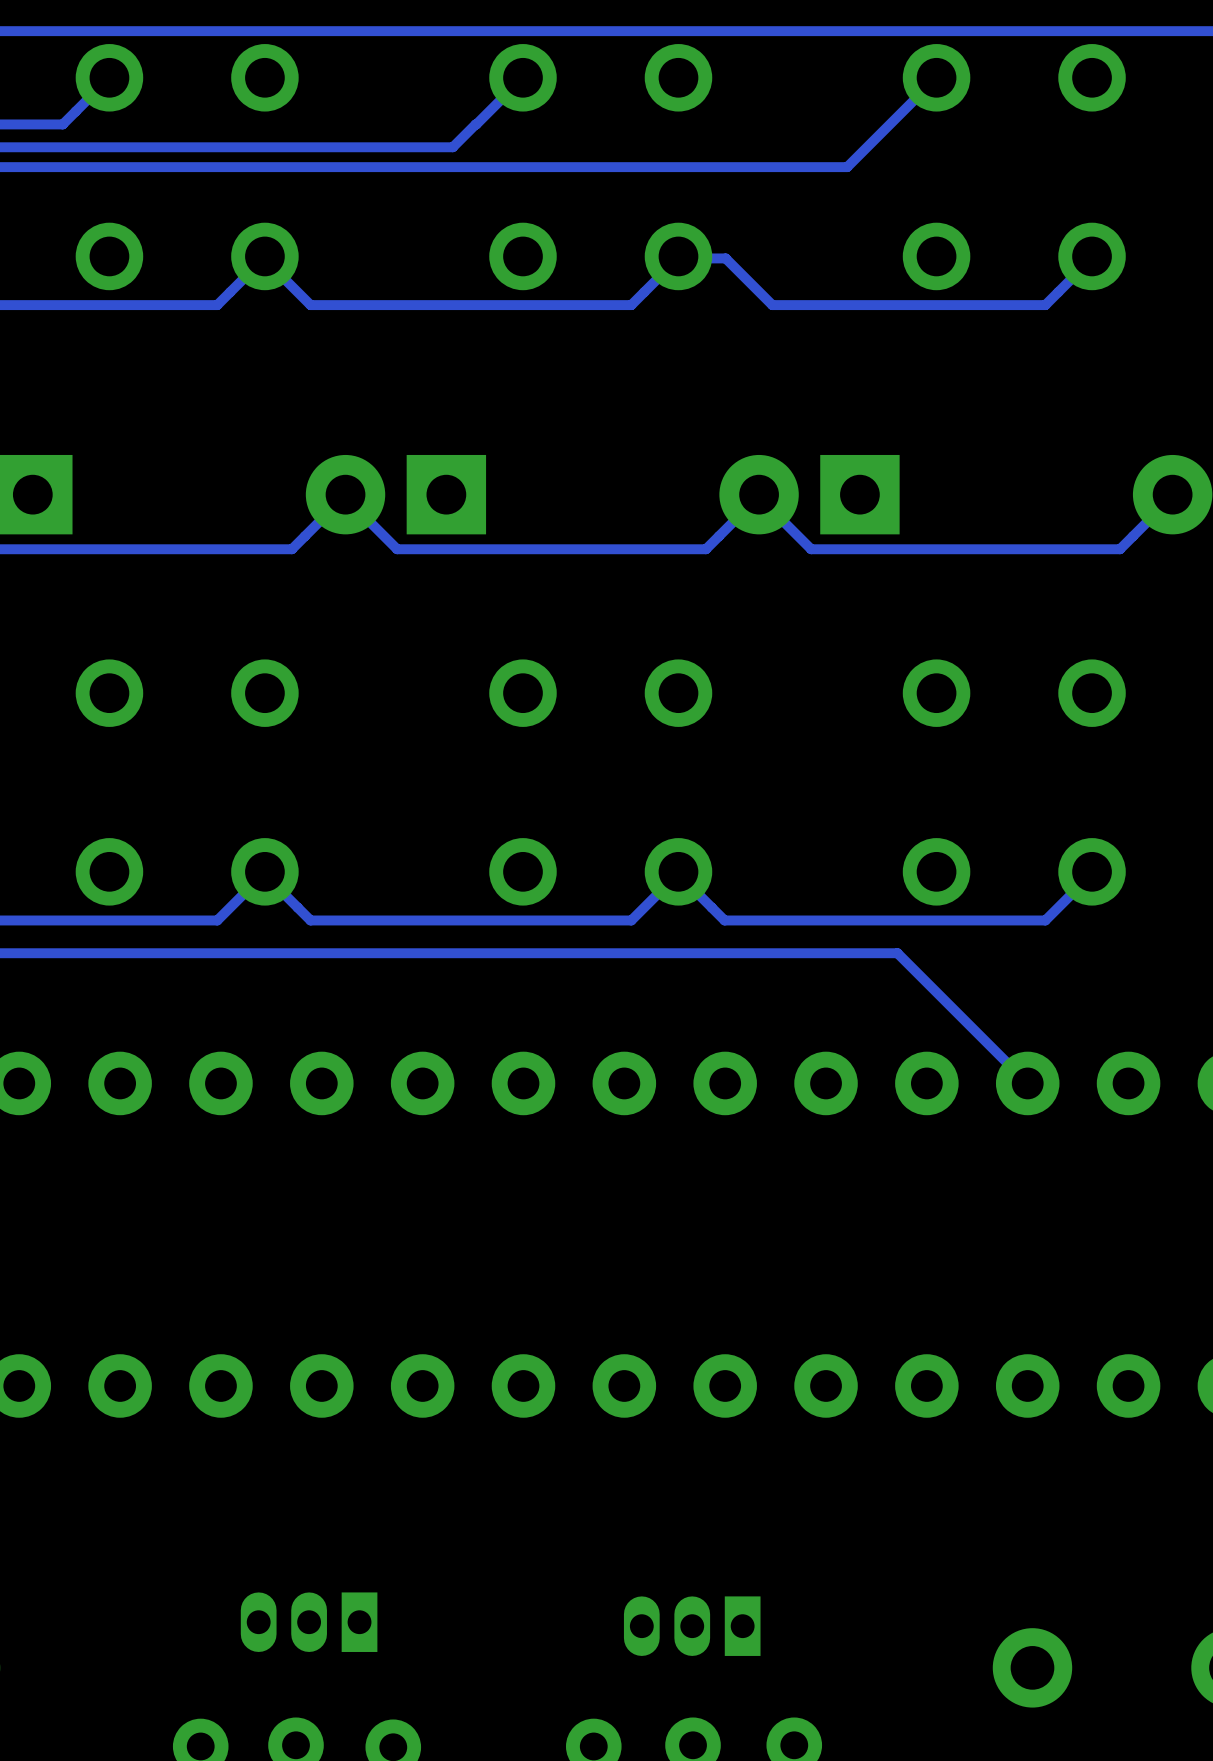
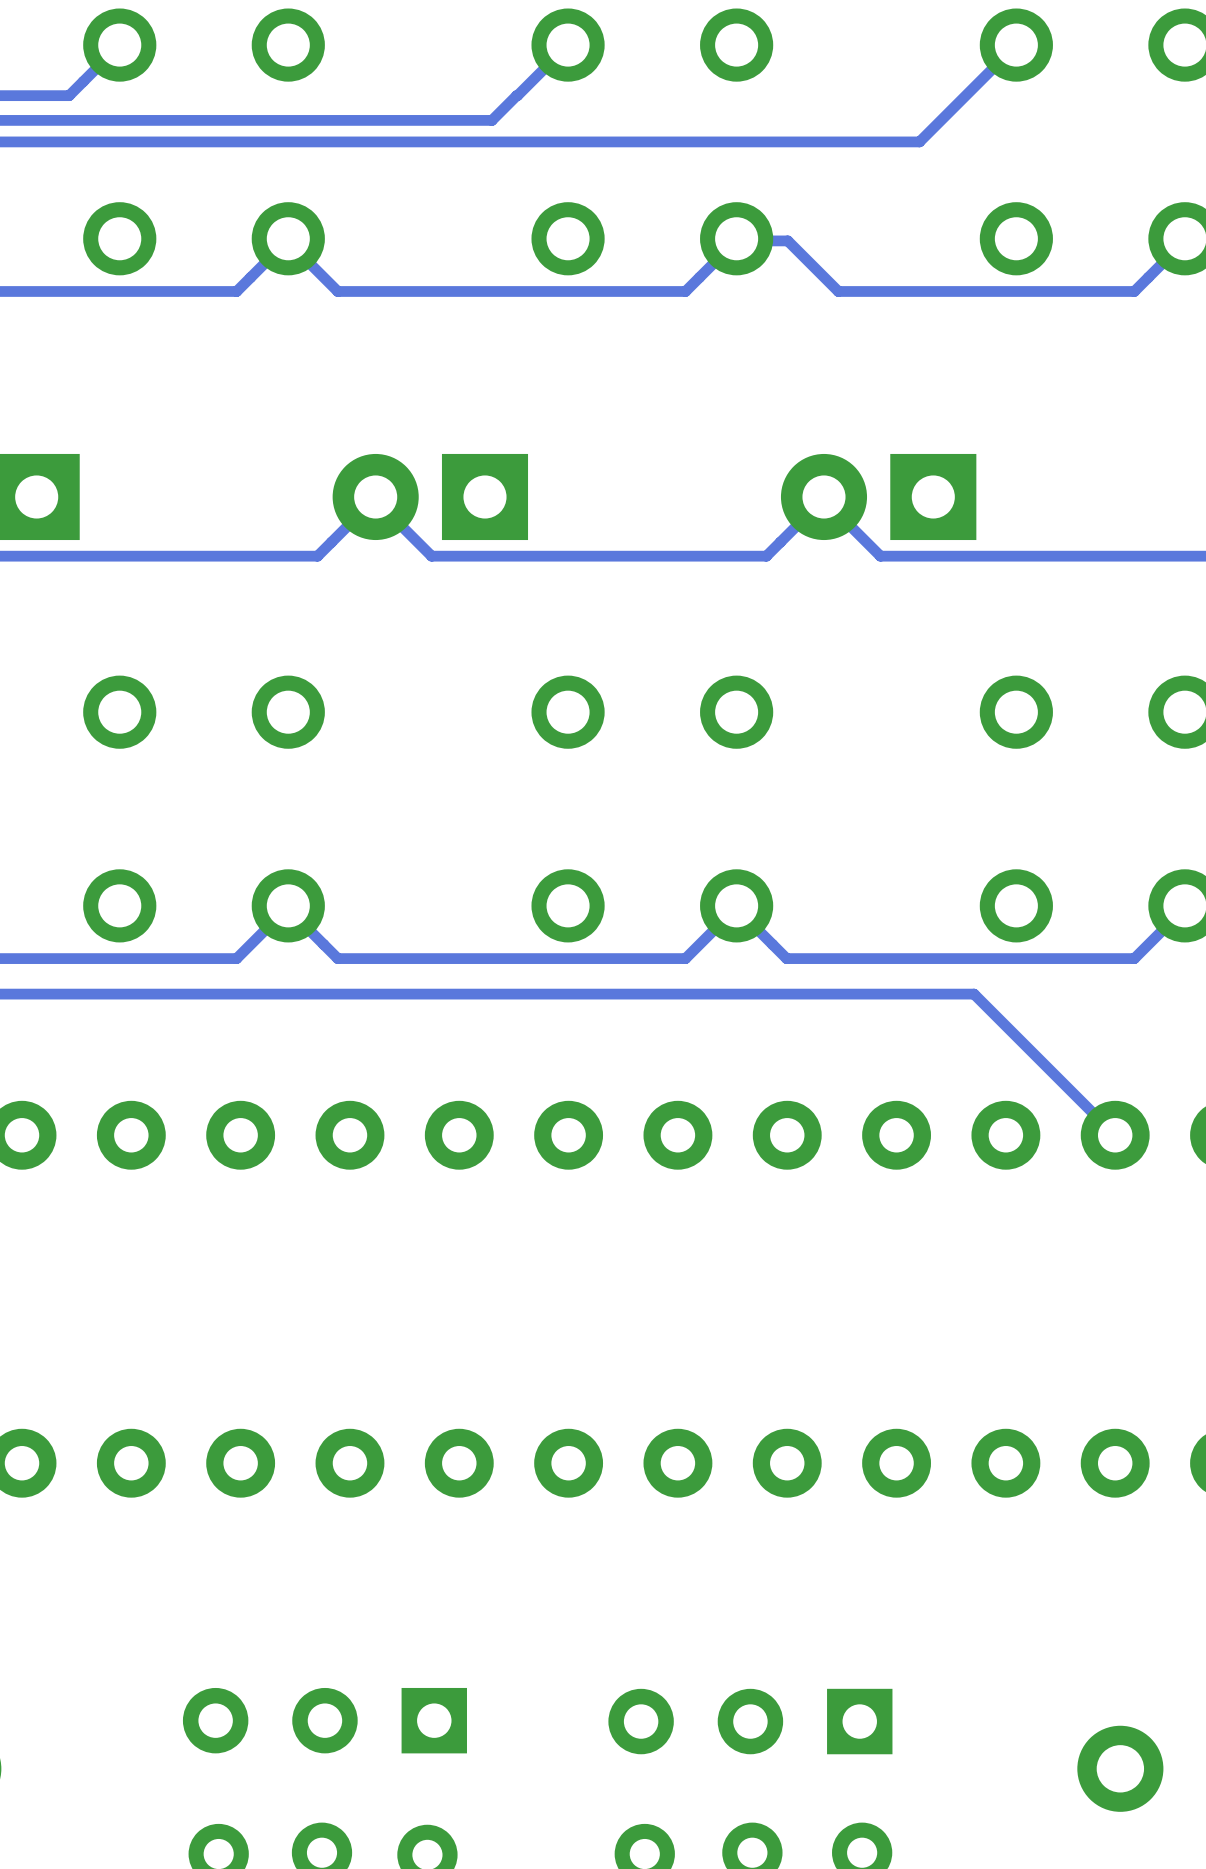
part footprint: [240, 1592, 378, 1652] -> [182, 1687, 467, 1754]
part footprint: [623, 1596, 761, 1656] -> [608, 1688, 893, 1755]

